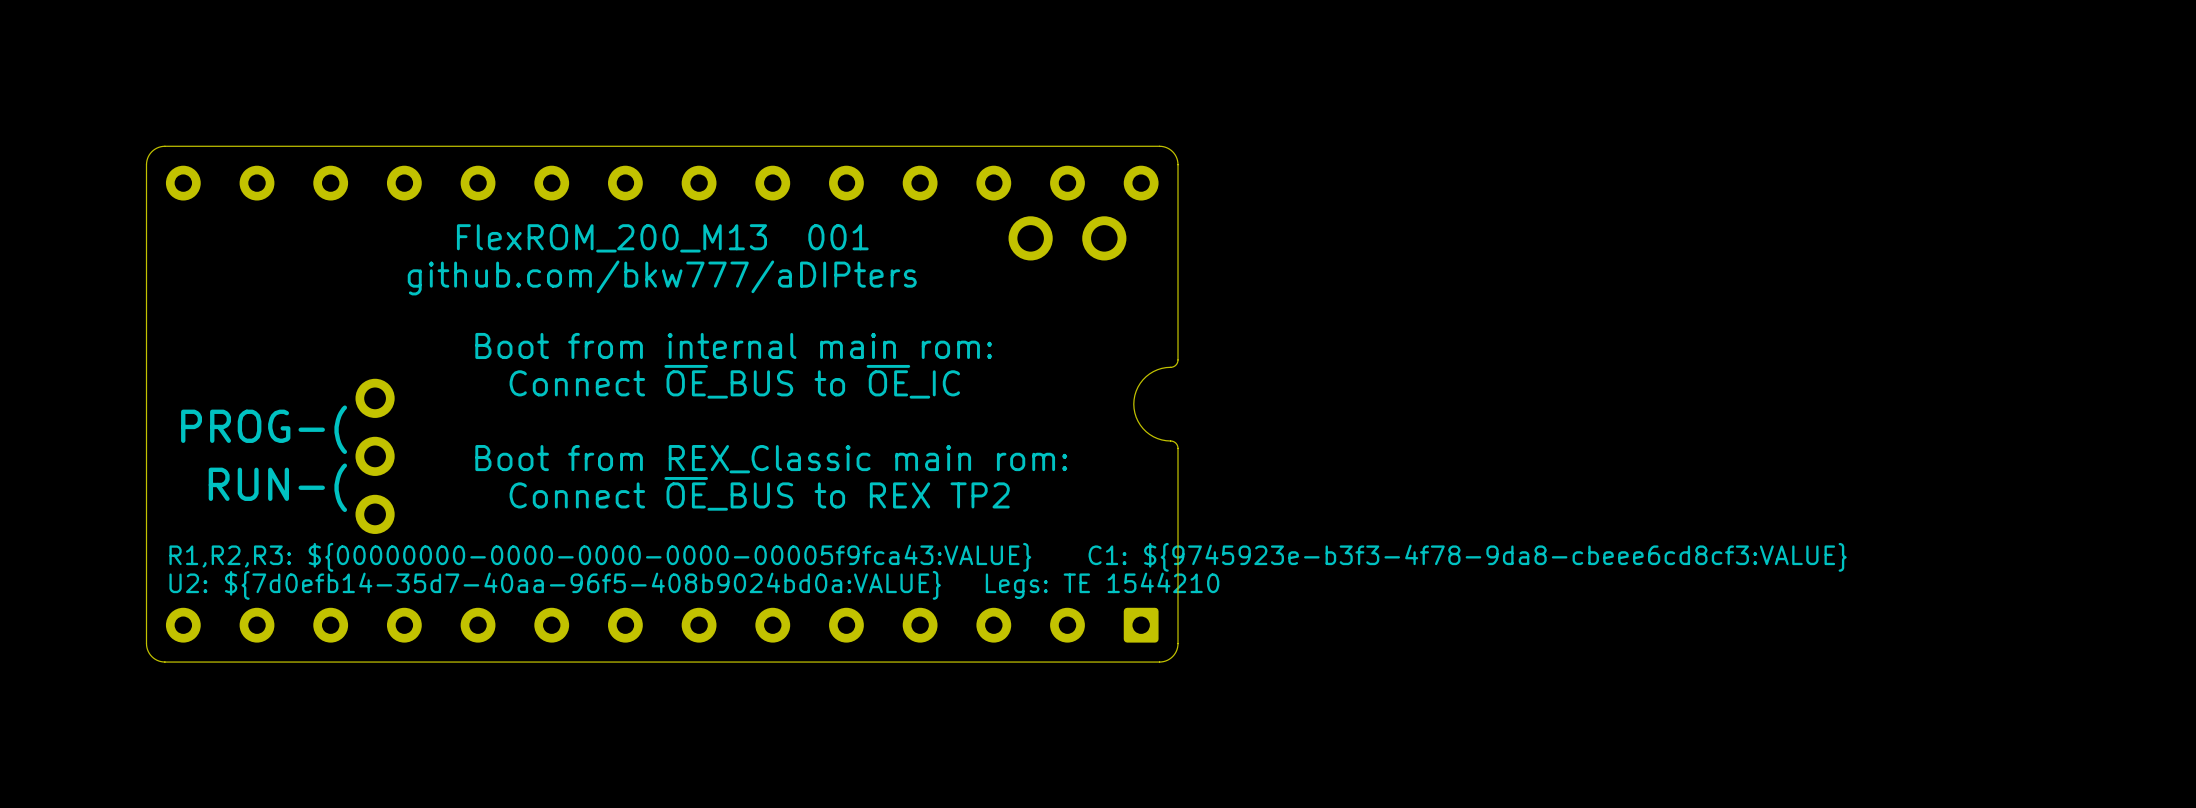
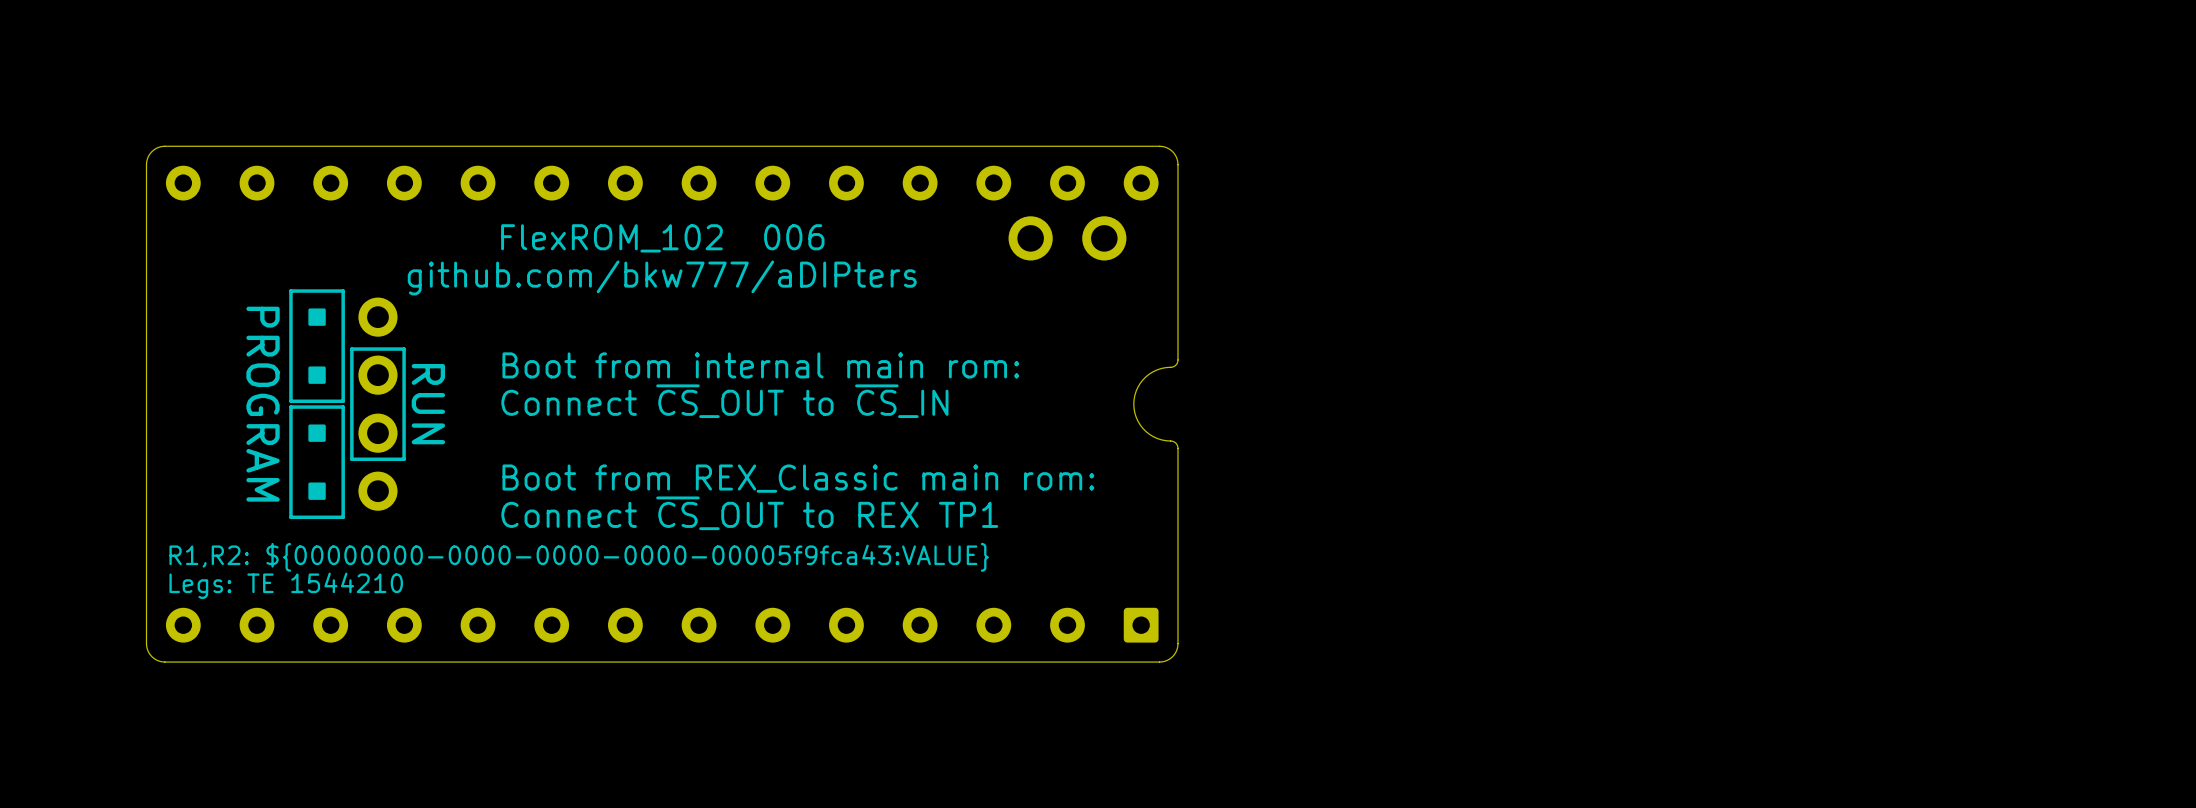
text: FlexROM_200_M13 001 (662, 238) -> FlexROM_102 006 (662, 238)
line: none -> (343, 291) (290, 291) (290, 401) (343, 401) (343, 291)
drawing: none -> [308, 308, 326, 326]
text position: Boot from internal main rom: (733, 345) -> Boot from internal main rom: (760, 365)
line: none -> (404, 349) (404, 459) (351, 459) (351, 349) (404, 349)
drawing: none -> [308, 366, 326, 384]
text: Connect ~{OE}_BUS to ~{OE}_IC (734, 381) -> Connect ~{CS}_OUT to ~{CS}_IN (724, 401)
part: none -> (377, 404)
text: none -> RUN (428, 404)
line: none -> (343, 407) (343, 517) (290, 517) (290, 407) (343, 407)
drawing: none -> [308, 424, 326, 442]
text: PROG-( (264, 429) -> PROGRAM (263, 404)
part: (375, 456) -> none
text position: Boot from REX_Classic main rom: (771, 459) -> Boot from REX_Classic main rom: (798, 478)
drawing: none -> [308, 482, 326, 500]
text: RUN-( (277, 487) -> none
text: Connect ~{OE}_BUS to REX TP2 (759, 493) -> Connect ~{CS}_OUT to REX TP1 (749, 513)
text: R1,R2,R3: ${00000000-0000-0000-0000-00005f9fca43:VALUE} C1: ${9745923e-b3f3-4f78-9da8-cbeee6cd8cf3:VALUE} (1008, 557) -> R1,R2: ${00000000-0000-0000-0000-00005f9fca43:VALUE} (579, 557)
text: U2: ${7d0efb14-35d7-40aa-96f5-408b9024bd0a:VALUE} Legs: TE 1544210 (694, 585) -> Legs: TE 1544210 (286, 585)

